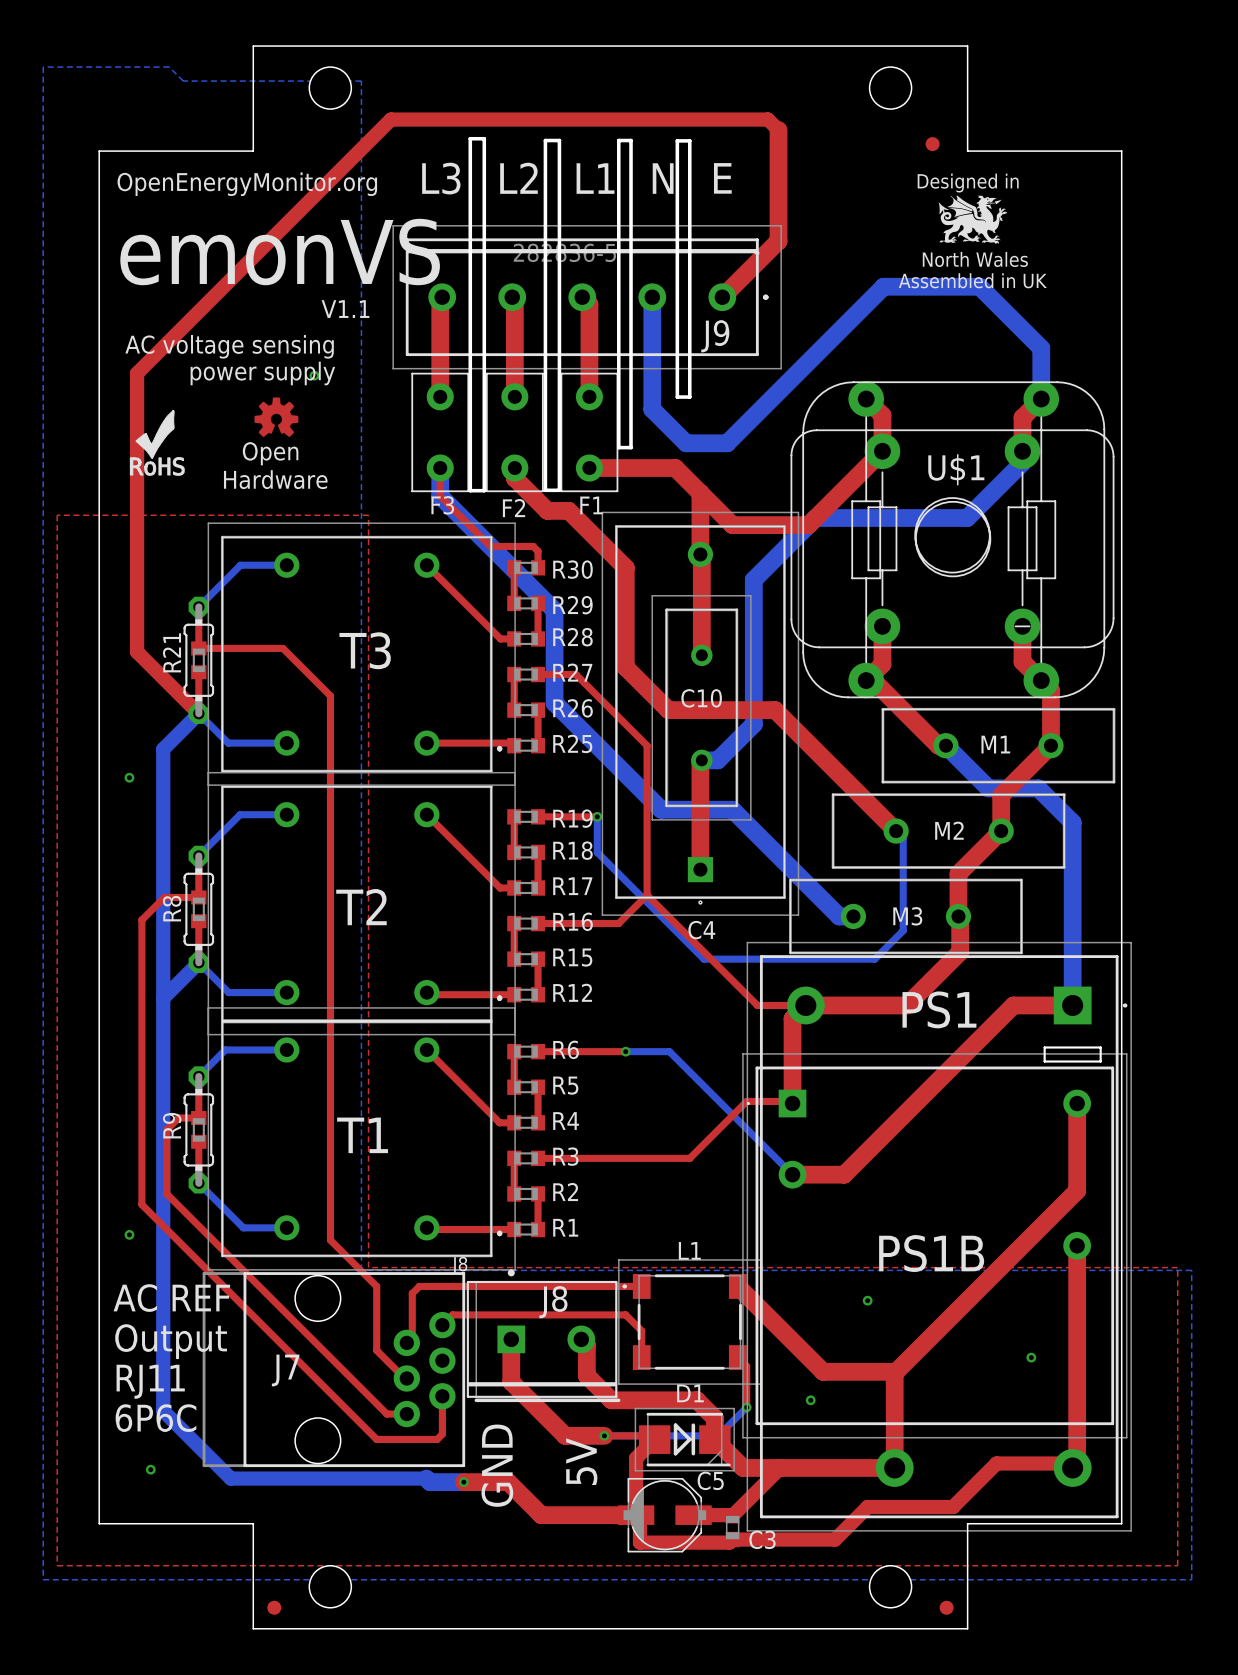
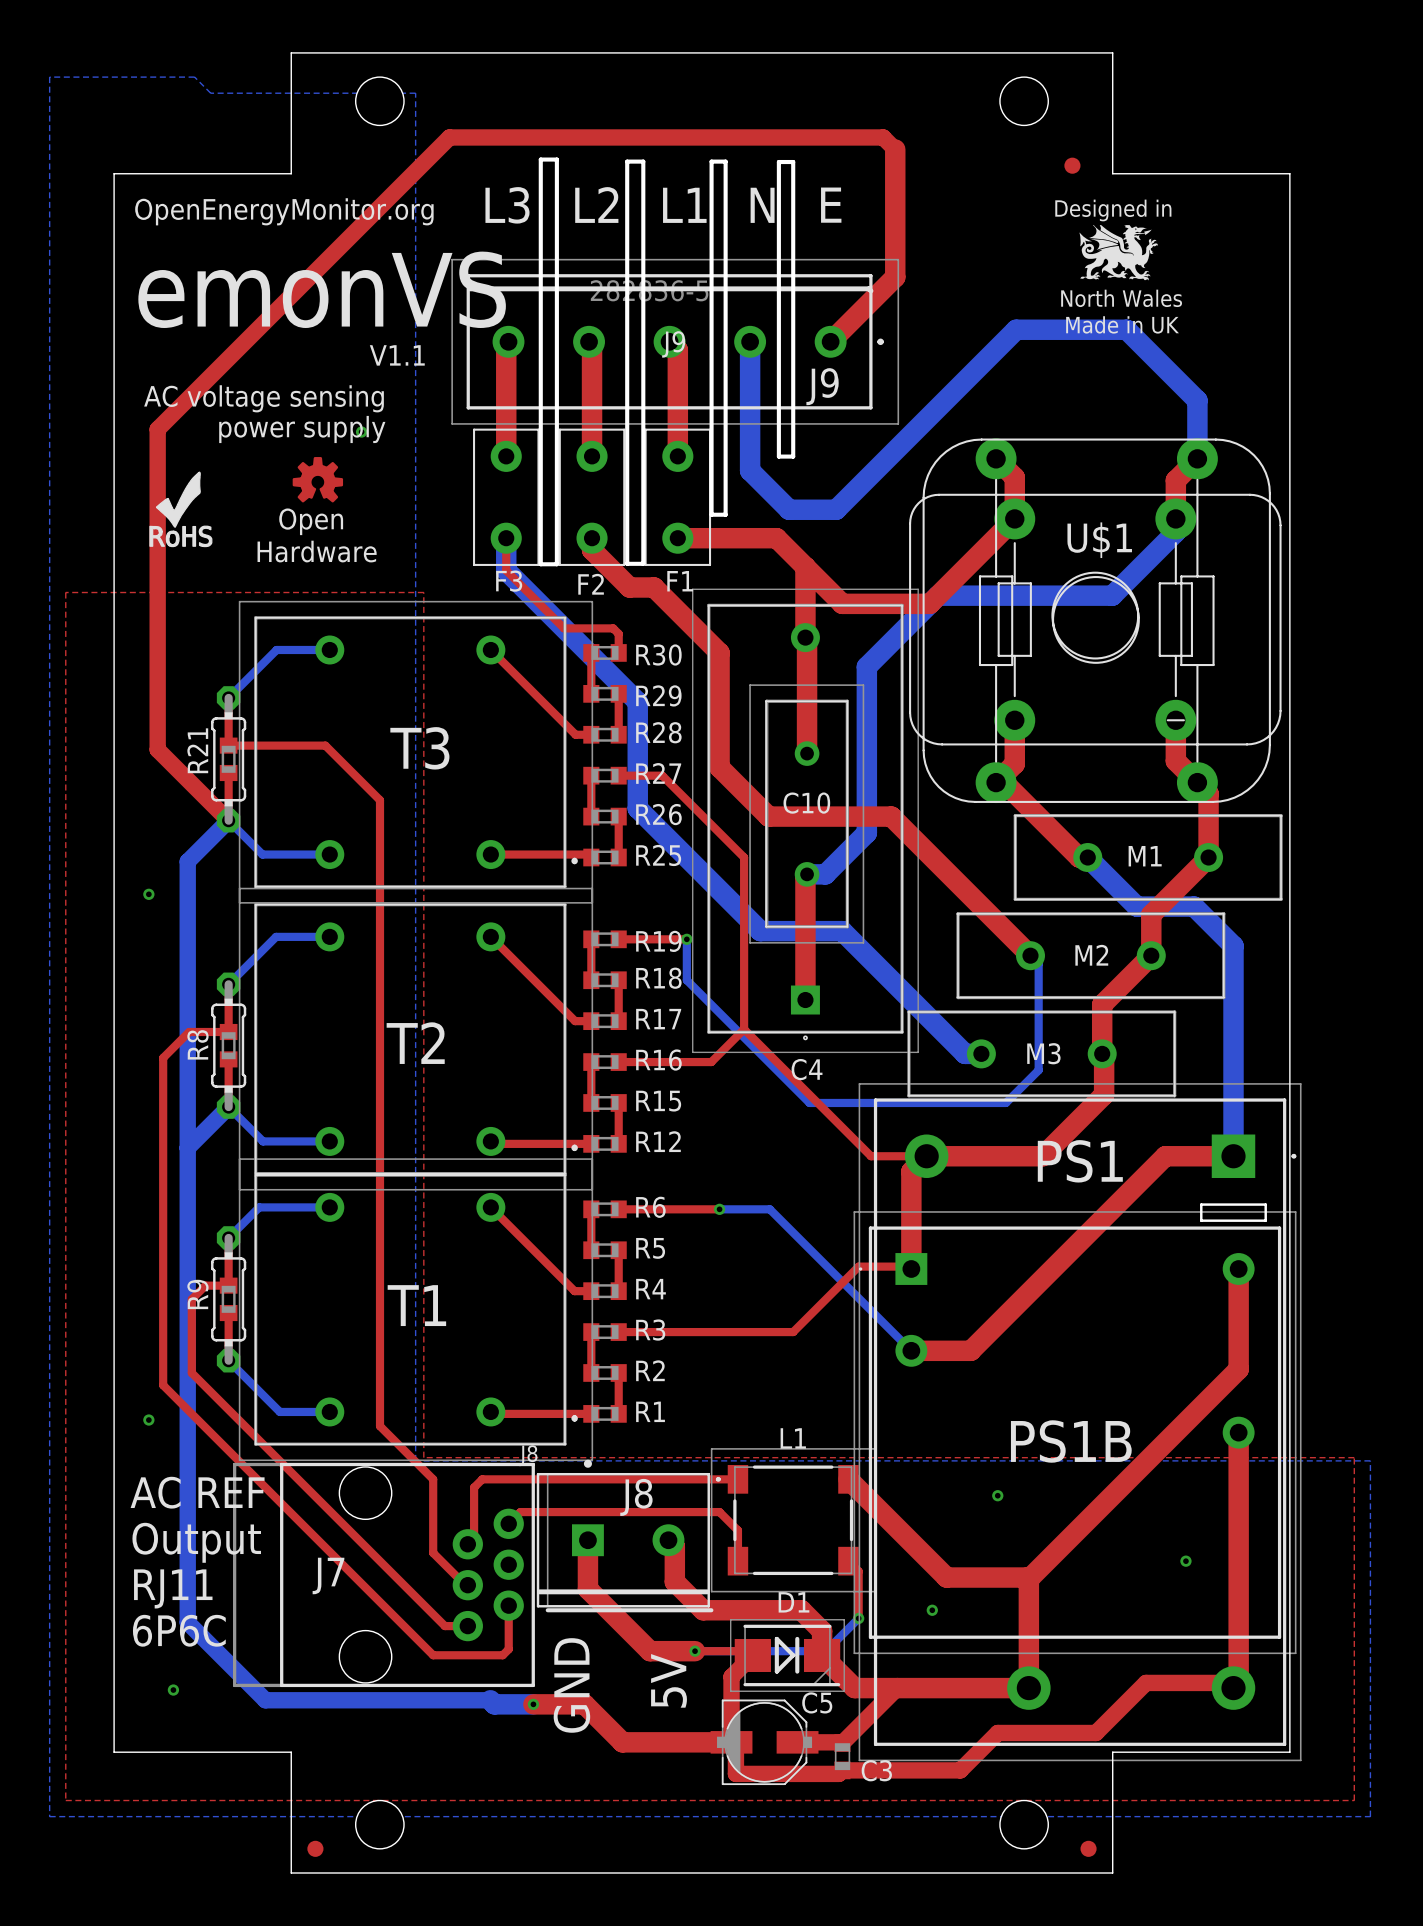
text: Assembled in UK (972, 280) -> none
text: none -> Made in UK (1122, 324)
J9 name: none -> J9 (673, 344)

